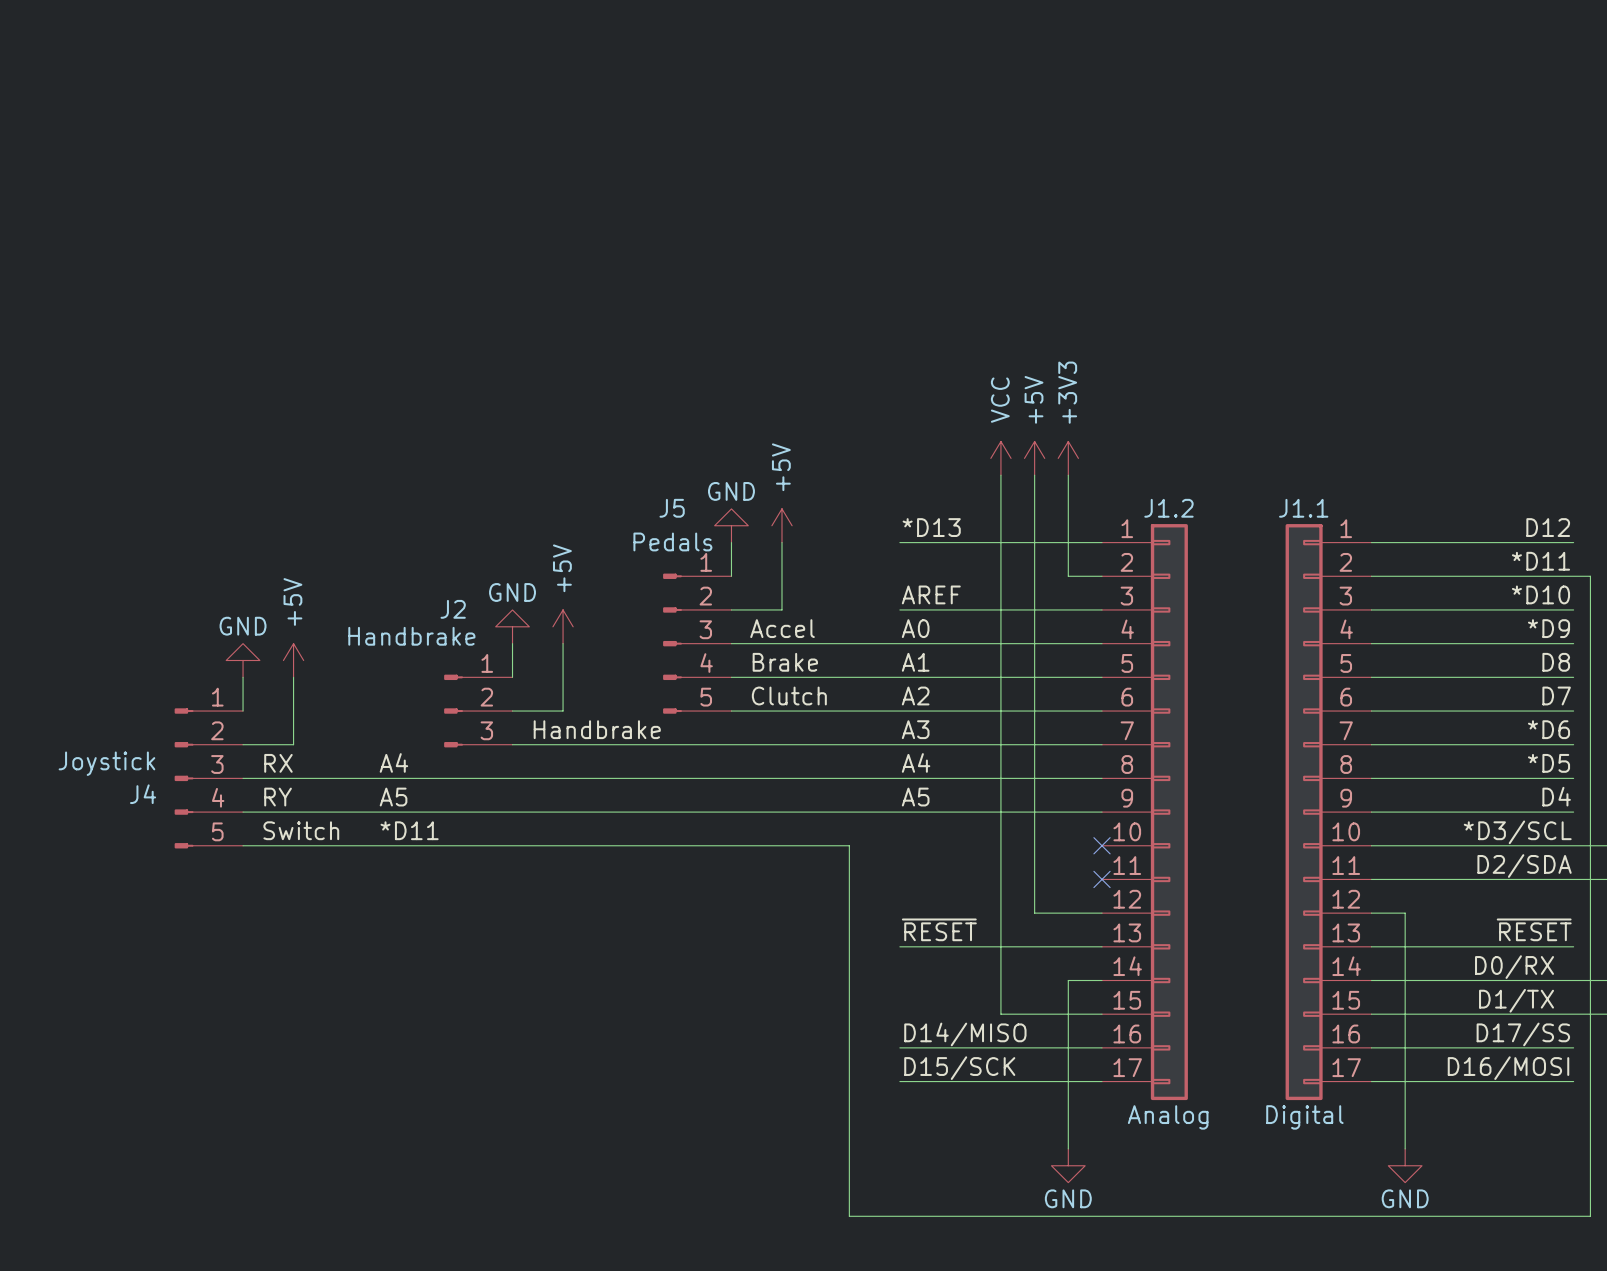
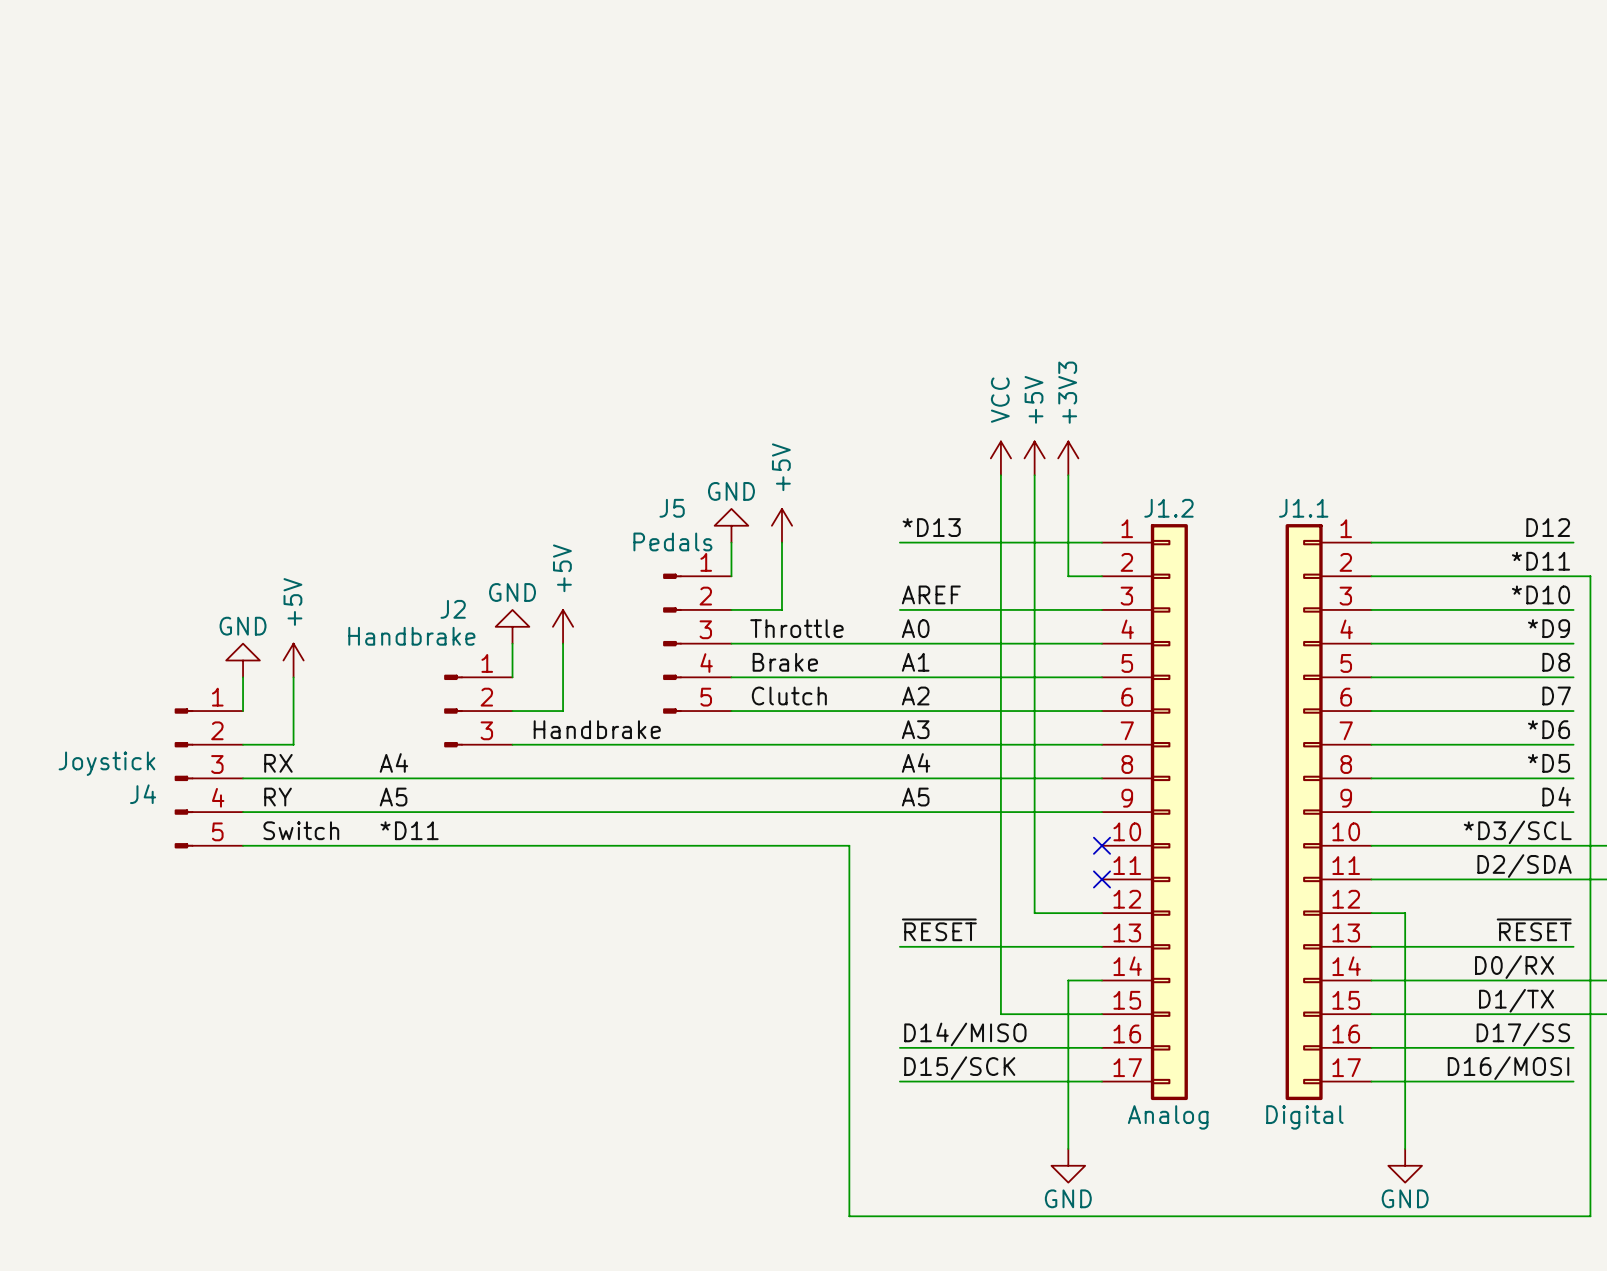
label: Accel (782, 628) -> Throttle (796, 628)

